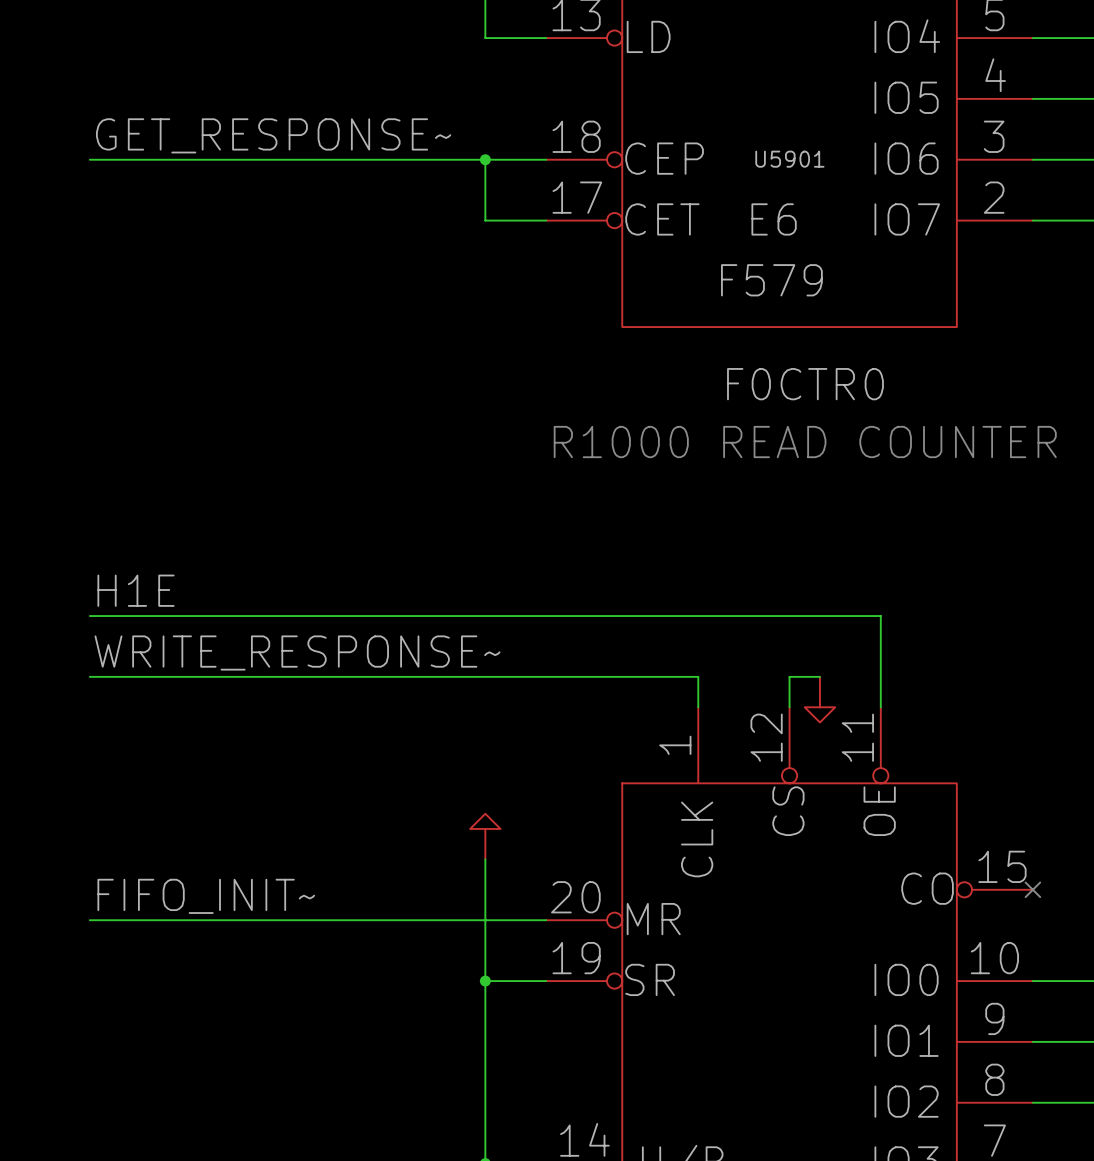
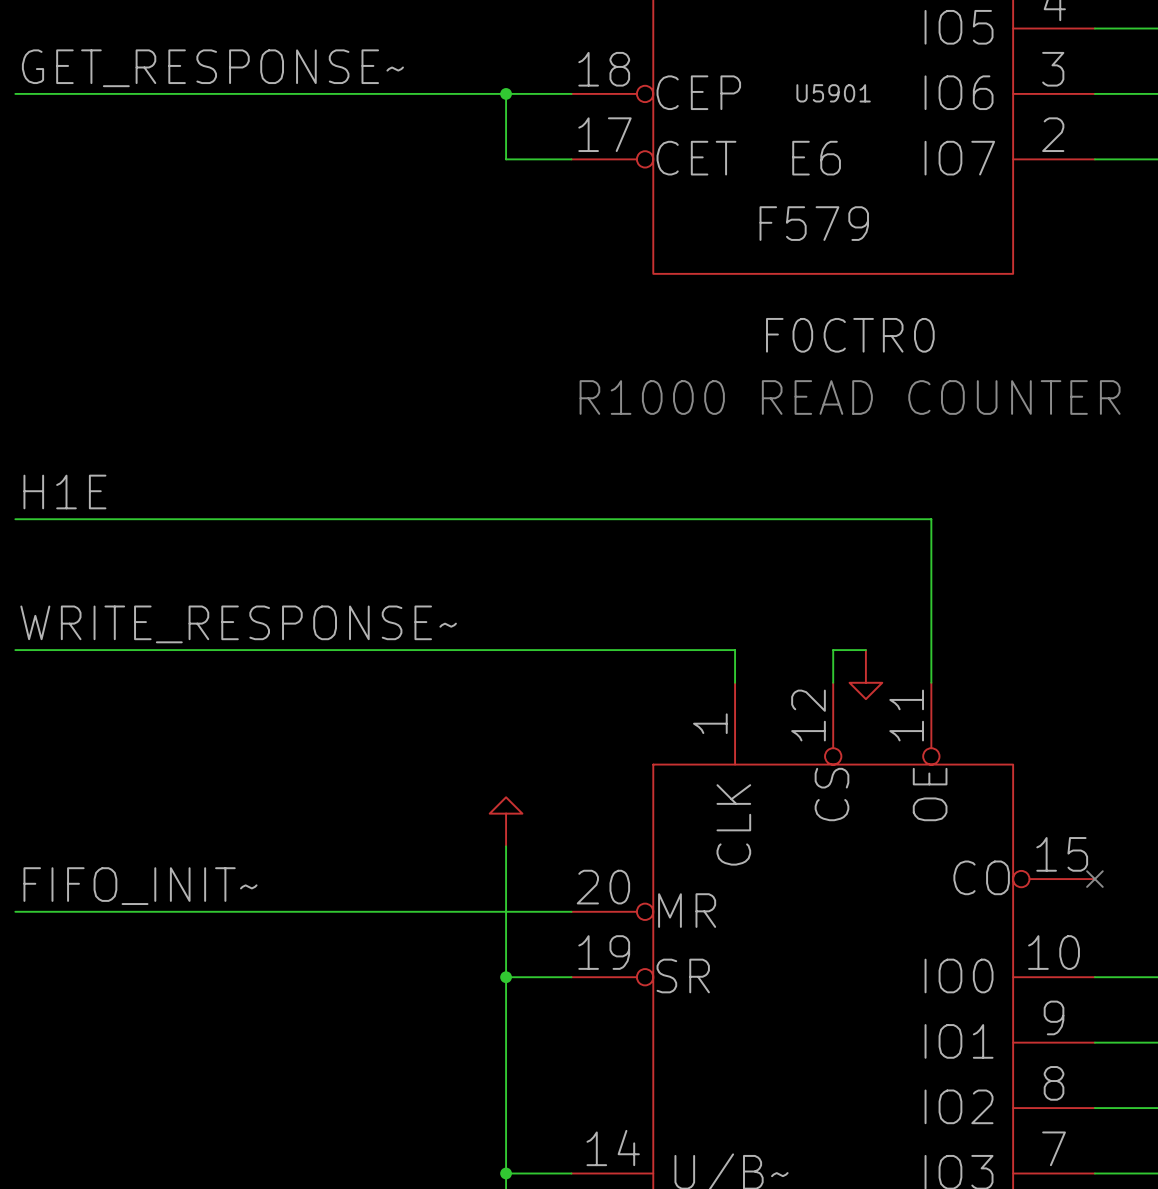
label position: GET_RESPONSE~ (273, 135) -> GET_RESPONSE~ (212, 68)
wire: none -> (15, 93) (80, 93)
label position: H1E (136, 590) -> H1E (64, 491)
wire: (89, 616) (880, 616) -> (15, 519) (931, 519) (931, 584)
label position: WRITE_RESPONSE~ (297, 653) -> WRITE_RESPONSE~ (238, 624)
wire: none -> (15, 650) (80, 650)
label position: FIFO_INIT~ (206, 896) -> FIFO_INIT~ (140, 886)
wire: none -> (15, 911) (80, 911)

